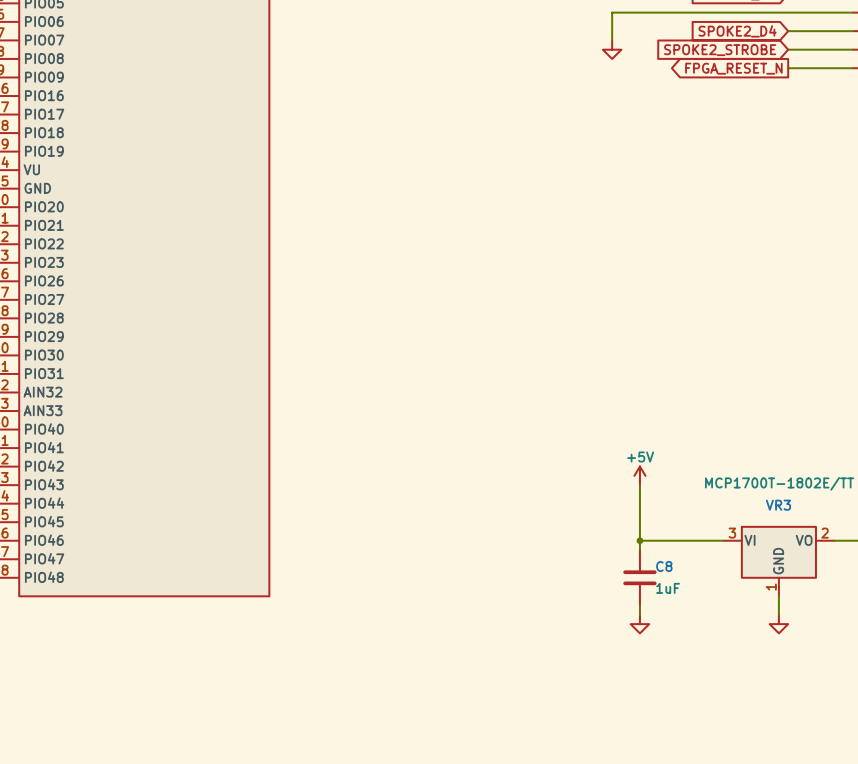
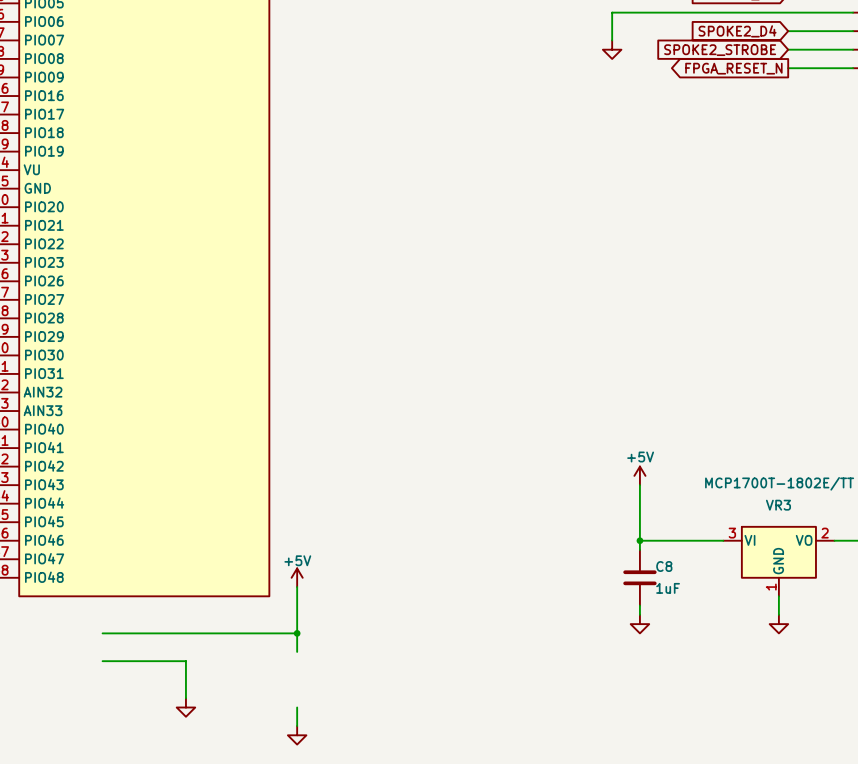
power symbol: none -> +5V (297, 577)
wire: none -> (297, 587) (297, 651)
wire: none -> (102, 633) (297, 633)
junction: none -> (297, 633)
wire: none -> (102, 661) (185, 661) (185, 698)
power symbol: none -> (185, 707)
wire: none -> (297, 707) (297, 726)
power symbol: none -> (297, 735)

